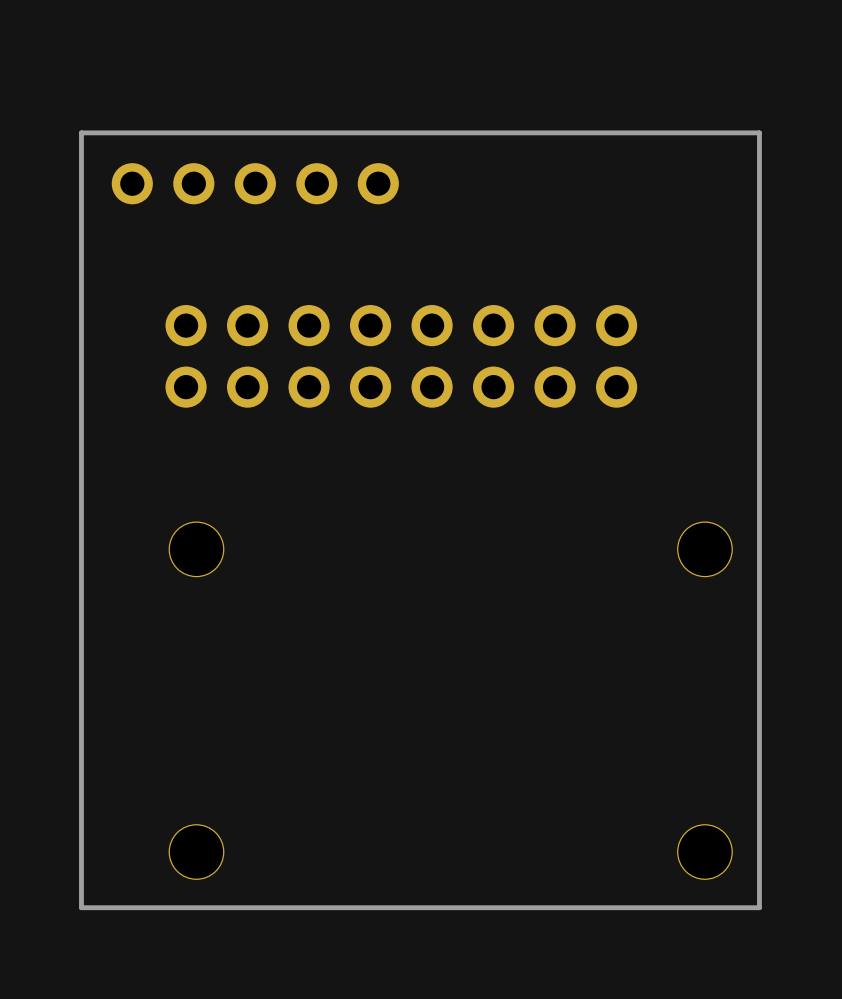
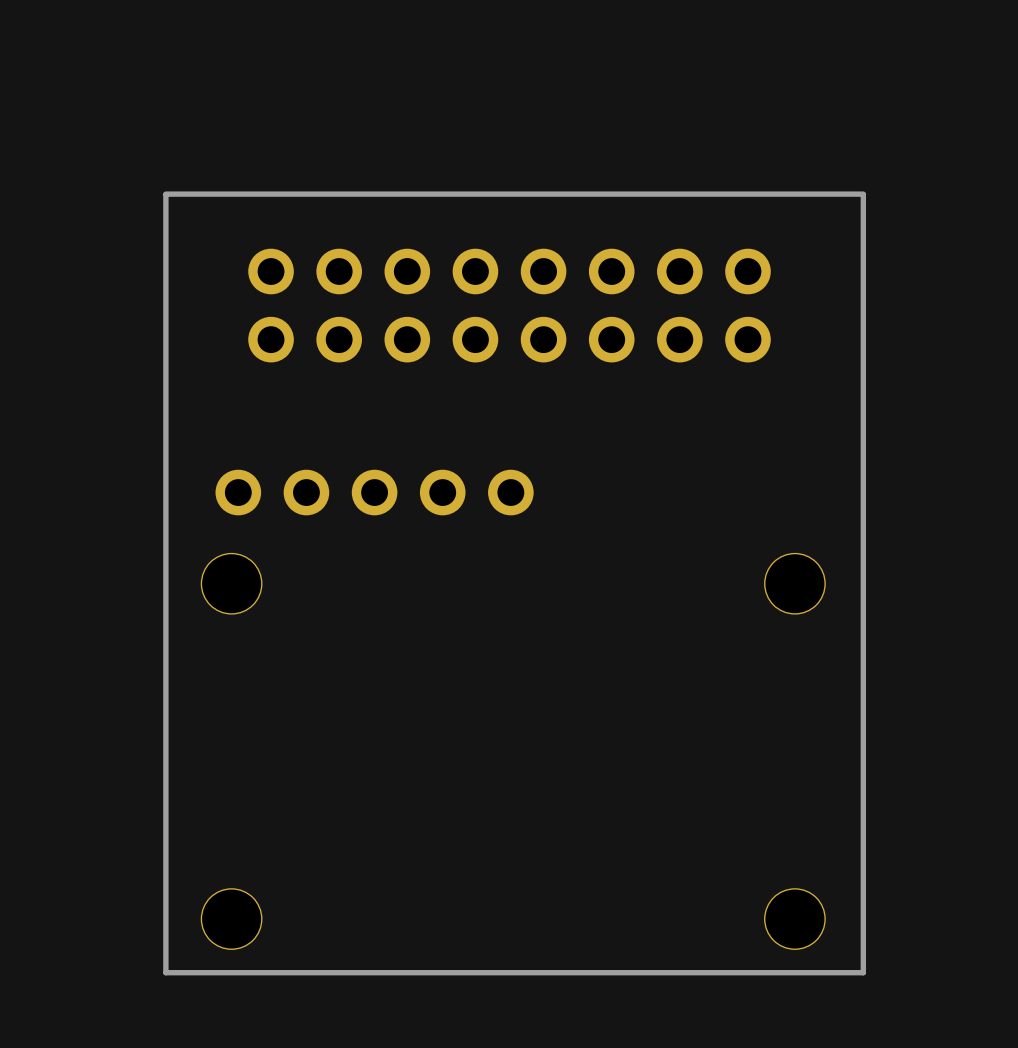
board edge: (759, 132) (81, 132) (81, 907) (759, 907) (759, 132) -> none
part position: (255, 183) -> (374, 492)
board edge: none -> (863, 194) (165, 194)
board edge: none -> (863, 194) (863, 972) (165, 972) (165, 194)
part position: (401, 356) -> (509, 305)

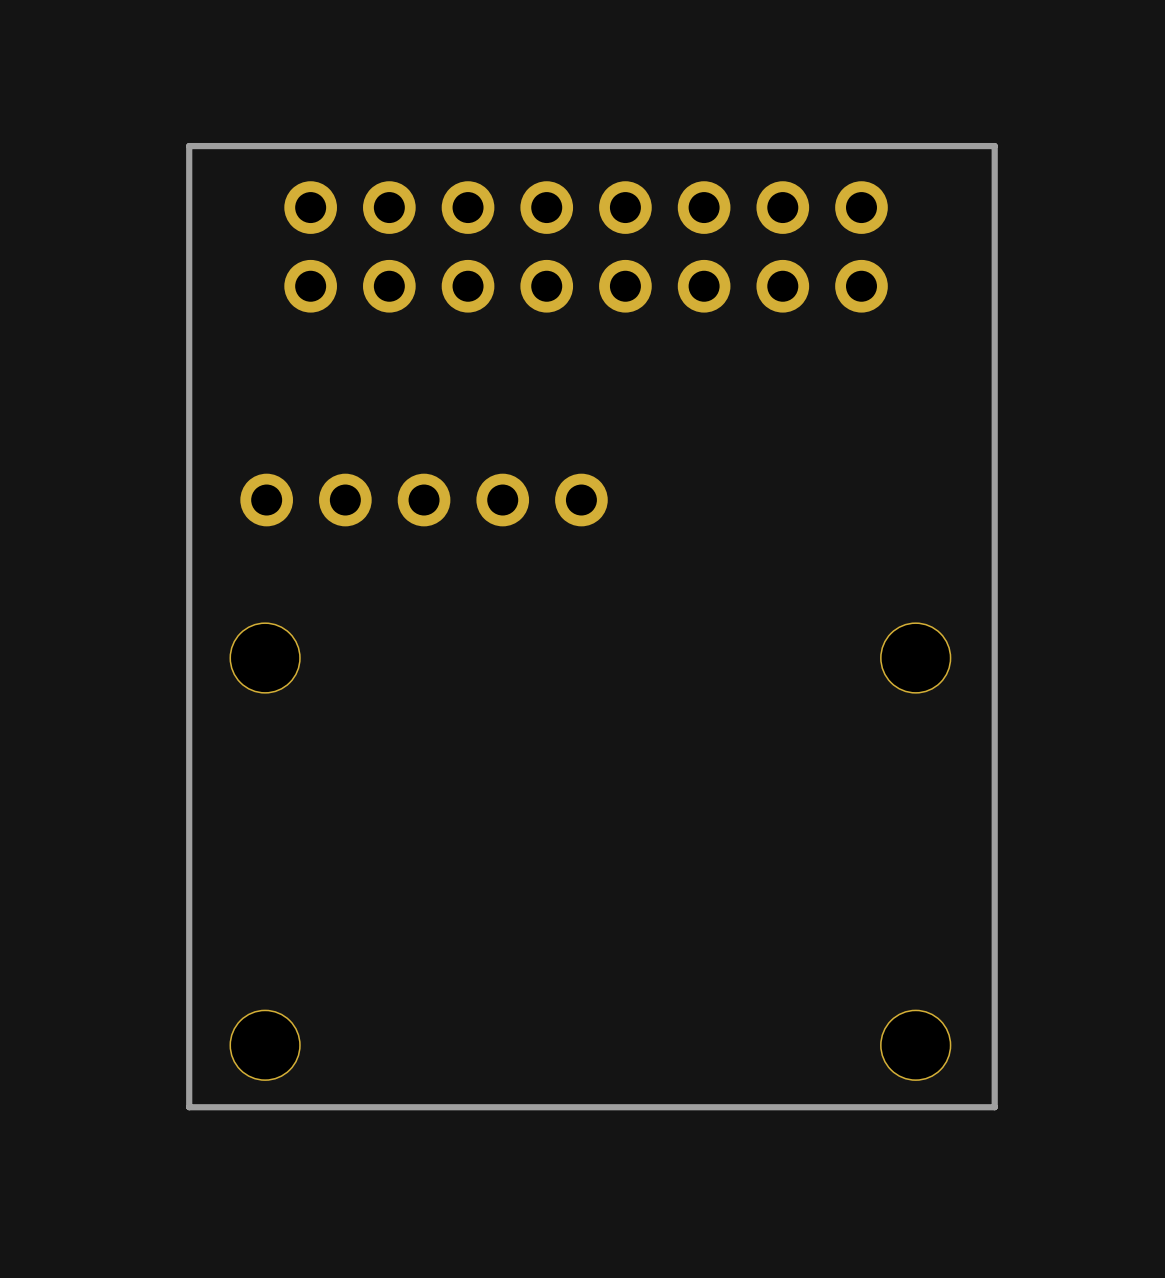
board edge: (863, 194) (165, 194) -> (994, 208) (994, 146) (189, 146) (189, 208)
part position: (509, 305) -> (586, 246)
part position: (374, 492) -> (424, 500)

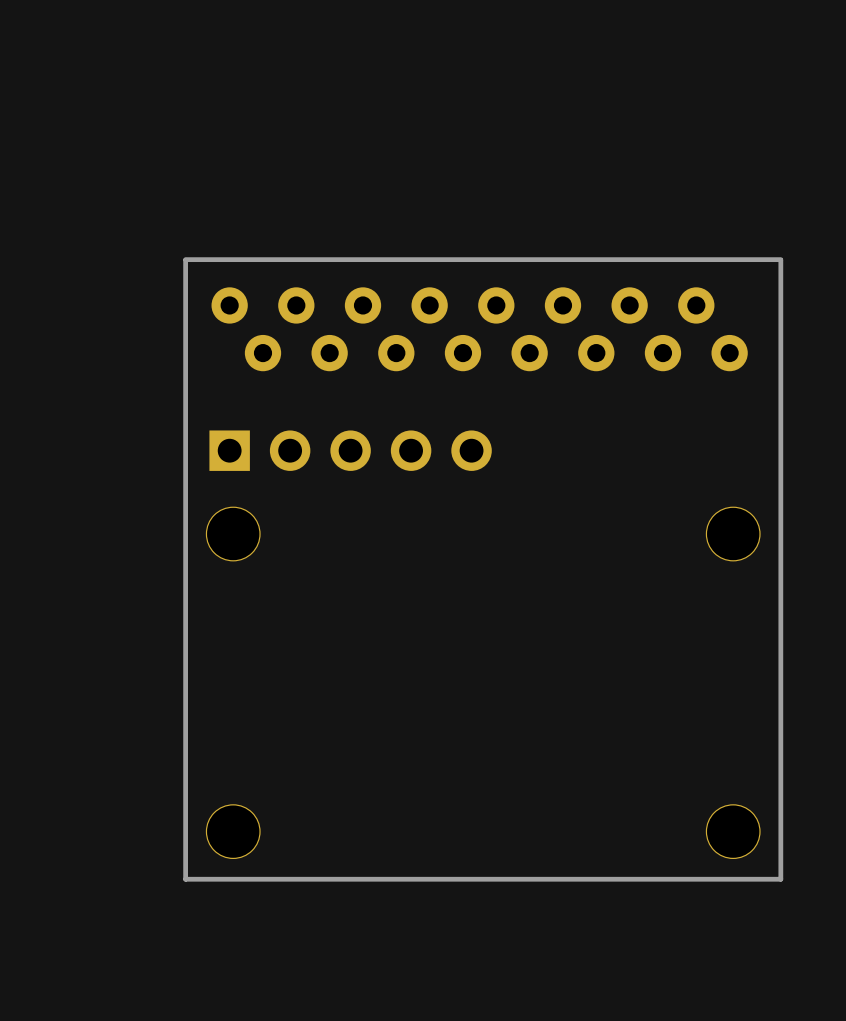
part: (586, 246) -> none
board edge: none -> (780, 259) (185, 259)
board edge: none -> (185, 260) (185, 879)
part: none -> (479, 329)
part: (424, 500) -> none
part: none -> (350, 450)
board edge: (977, 1107) (994, 1107) (994, 146) (189, 146) (189, 1107) (203, 1107) -> (780, 879) (780, 260)

